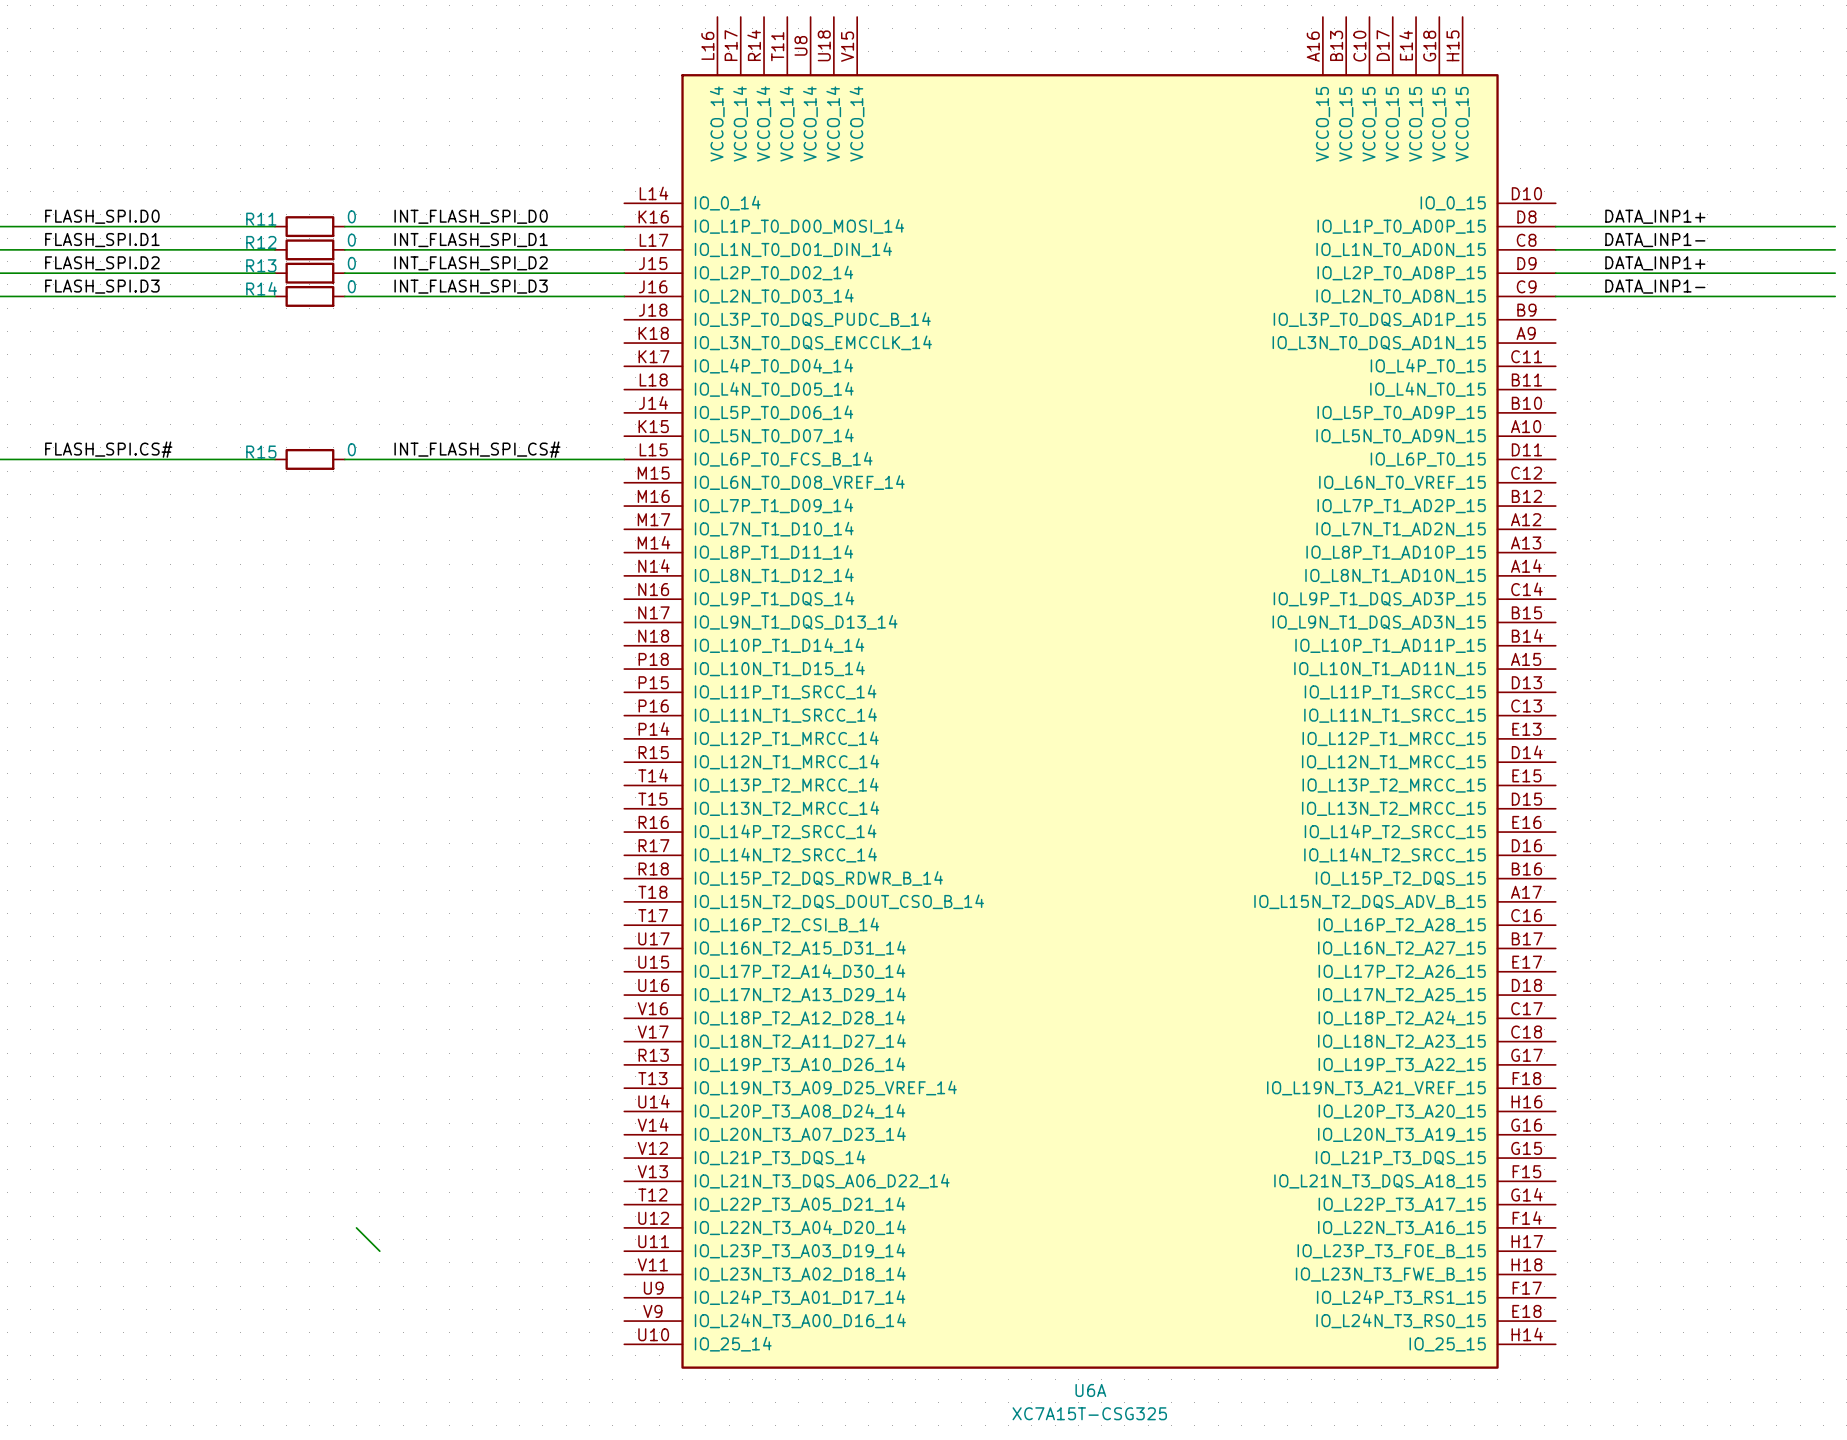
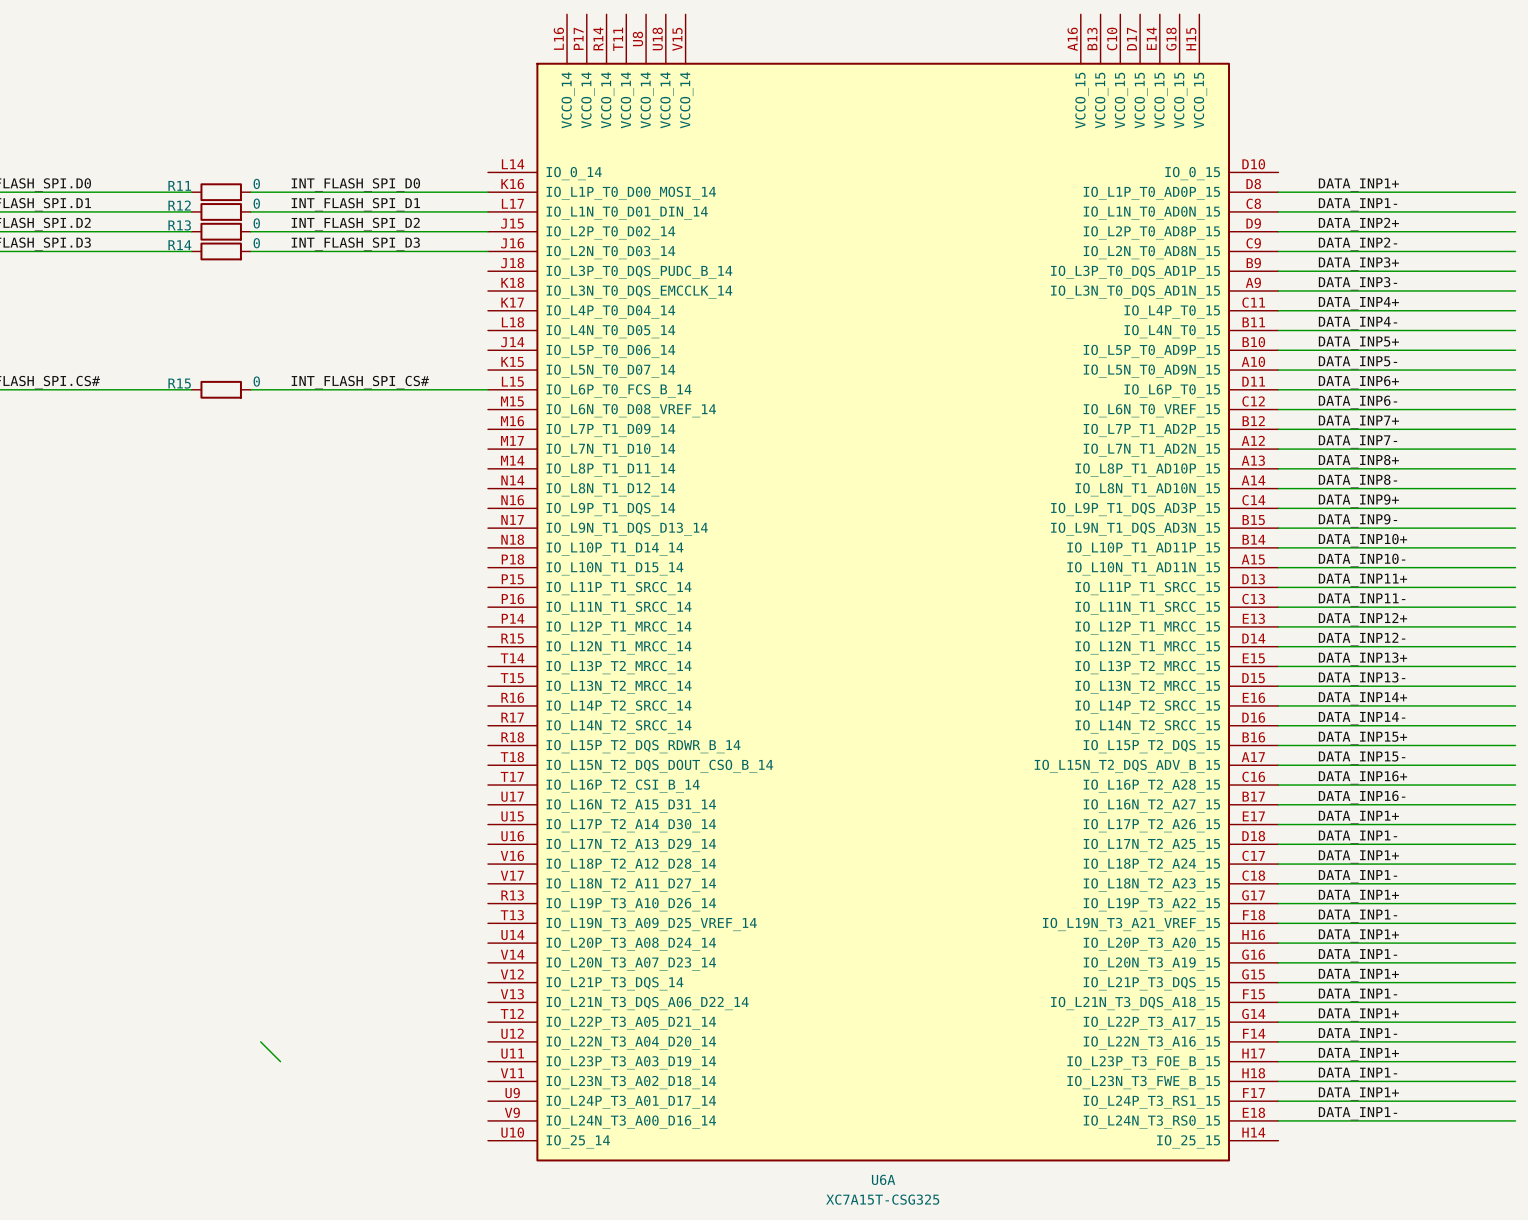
label: DATA_INP1+ (1655, 263) -> DATA_INP2+ (1358, 224)
label: DATA_INP1- (1655, 286) -> DATA_INP2- (1358, 244)
label: none -> DATA_INP3+ (1358, 263)
wire: none -> (1278, 271) (1515, 271)
label: none -> DATA_INP3- (1358, 283)
wire: none -> (1278, 290) (1515, 290)
label: none -> DATA_INP4+ (1358, 303)
wire: none -> (1278, 310) (1515, 310)
label: none -> DATA_INP4- (1358, 323)
wire: none -> (1278, 330) (1515, 330)
label: none -> DATA_INP5+ (1358, 343)
wire: none -> (1278, 350) (1515, 350)
label: none -> DATA_INP5- (1358, 362)
wire: none -> (1278, 370) (1515, 370)
label: none -> DATA_INP6+ (1358, 382)
wire: none -> (1278, 389) (1515, 389)
label: none -> DATA_INP6- (1358, 402)
wire: none -> (1278, 409) (1515, 409)
label: none -> DATA_INP7+ (1358, 422)
wire: none -> (1278, 429) (1515, 429)
label: none -> DATA_INP7- (1358, 441)
wire: none -> (1278, 449) (1515, 449)
label: none -> DATA_INP8+ (1358, 461)
wire: none -> (1278, 468) (1515, 468)
label: none -> DATA_INP8- (1358, 481)
wire: none -> (1278, 488) (1515, 488)
label: none -> DATA_INP9+ (1358, 501)
wire: none -> (1278, 508) (1515, 508)
label: none -> DATA_INP9- (1358, 520)
wire: none -> (1278, 528) (1515, 528)
label: none -> DATA_INP10+ (1362, 540)
wire: none -> (1278, 547) (1515, 547)
label: none -> DATA_INP10- (1362, 560)
wire: none -> (1278, 567) (1515, 567)
label: none -> DATA_INP11+ (1362, 580)
wire: none -> (1278, 587) (1515, 587)
label: none -> DATA_INP11- (1362, 599)
wire: none -> (1278, 607) (1515, 607)
label: none -> DATA_INP12+ (1362, 619)
wire: none -> (1278, 626) (1515, 626)
label: none -> DATA_INP12- (1362, 639)
wire: none -> (1278, 646) (1515, 646)
label: none -> DATA_INP13+ (1362, 659)
wire: none -> (1278, 666) (1515, 666)
label: none -> DATA_INP13- (1362, 678)
wire: none -> (1278, 686) (1515, 686)
label: none -> DATA_INP14+ (1362, 698)
wire: none -> (1278, 705) (1515, 705)
label: none -> DATA_INP14- (1362, 718)
wire: none -> (1278, 725) (1515, 725)
label: none -> DATA_INP15+ (1362, 738)
wire: none -> (1278, 745) (1515, 745)
label: none -> DATA_INP15- (1362, 758)
wire: none -> (1278, 765) (1515, 765)
label: none -> DATA_INP16+ (1362, 777)
wire: none -> (1278, 785) (1515, 785)
label: none -> DATA_INP16- (1362, 797)
wire: none -> (1278, 804) (1515, 804)
label: none -> DATA_INP1+ (1358, 817)
wire: none -> (1278, 824) (1515, 824)
label: none -> DATA_INP1- (1358, 837)
wire: none -> (1278, 844) (1515, 844)
label: none -> DATA_INP1+ (1358, 856)
wire: none -> (1278, 864) (1515, 864)
label: none -> DATA_INP1- (1358, 876)
wire: none -> (1278, 883) (1515, 883)
label: none -> DATA_INP1+ (1358, 896)
wire: none -> (1278, 903) (1515, 903)
label: none -> DATA_INP1- (1358, 916)
wire: none -> (1278, 923) (1515, 923)
label: none -> DATA_INP1+ (1358, 935)
wire: none -> (1278, 943) (1515, 943)
label: none -> DATA_INP1- (1358, 955)
wire: none -> (1278, 962) (1515, 962)
label: none -> DATA_INP1+ (1358, 975)
wire: none -> (1278, 982) (1515, 982)
label: none -> DATA_INP1- (1358, 995)
wire: none -> (1278, 1002) (1515, 1002)
label: none -> DATA_INP1+ (1358, 1014)
wire: none -> (1278, 1022) (1515, 1022)
label: none -> DATA_INP1- (1358, 1034)
wire: none -> (1278, 1041) (1515, 1041)
label: none -> DATA_INP1+ (1358, 1054)
wire: none -> (1278, 1061) (1515, 1061)
label: none -> DATA_INP1- (1358, 1074)
wire: none -> (1278, 1081) (1515, 1081)
label: none -> DATA_INP1+ (1358, 1093)
wire: none -> (1278, 1101) (1515, 1101)
label: none -> DATA_INP1- (1358, 1113)
wire: none -> (1278, 1120) (1515, 1120)

